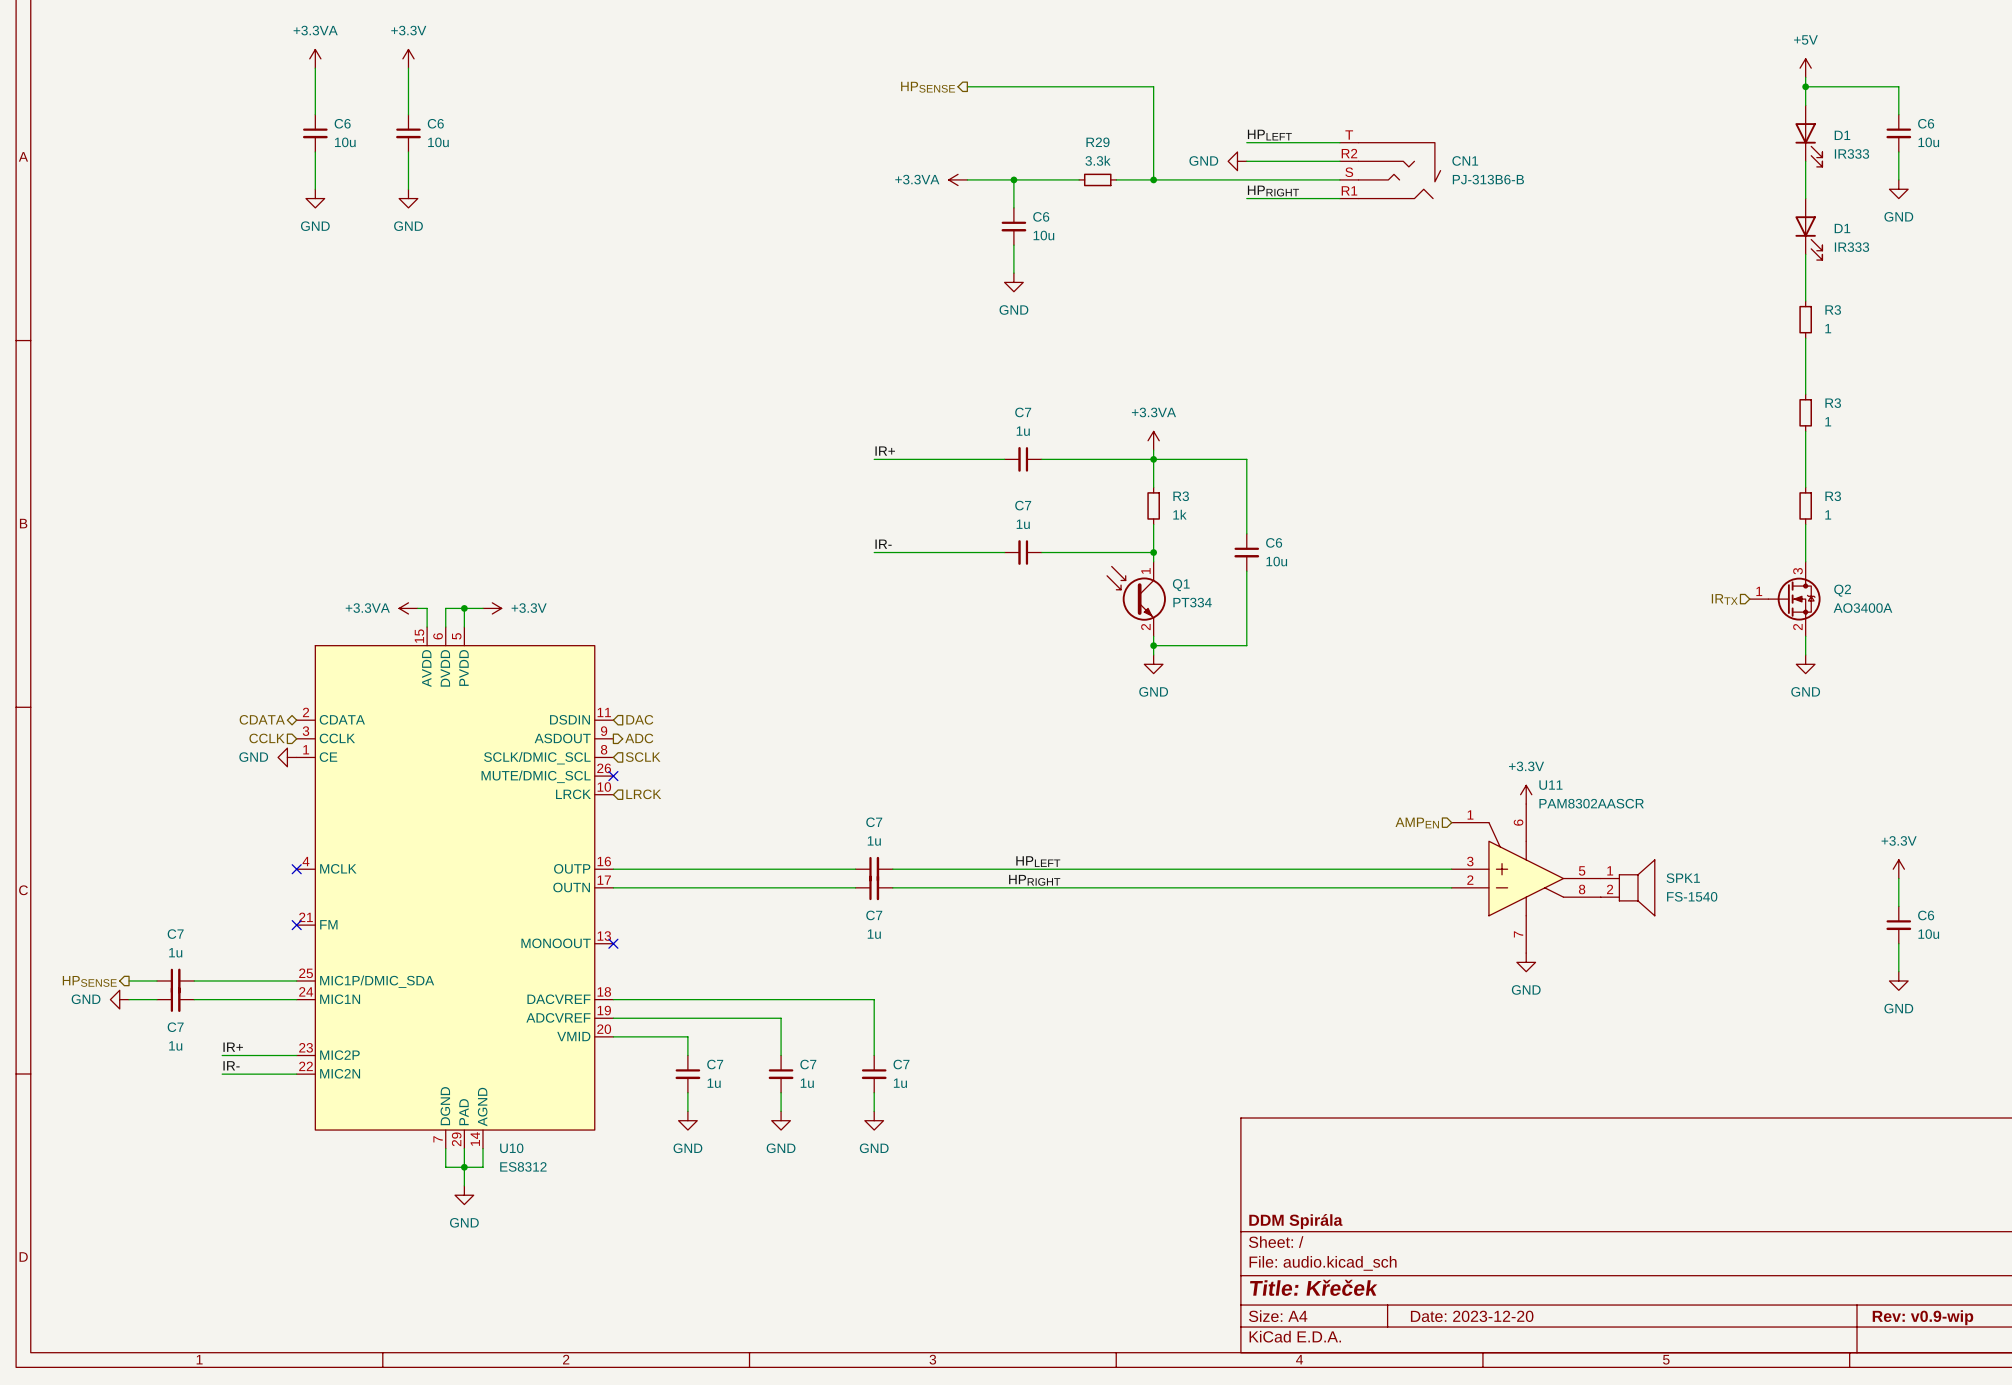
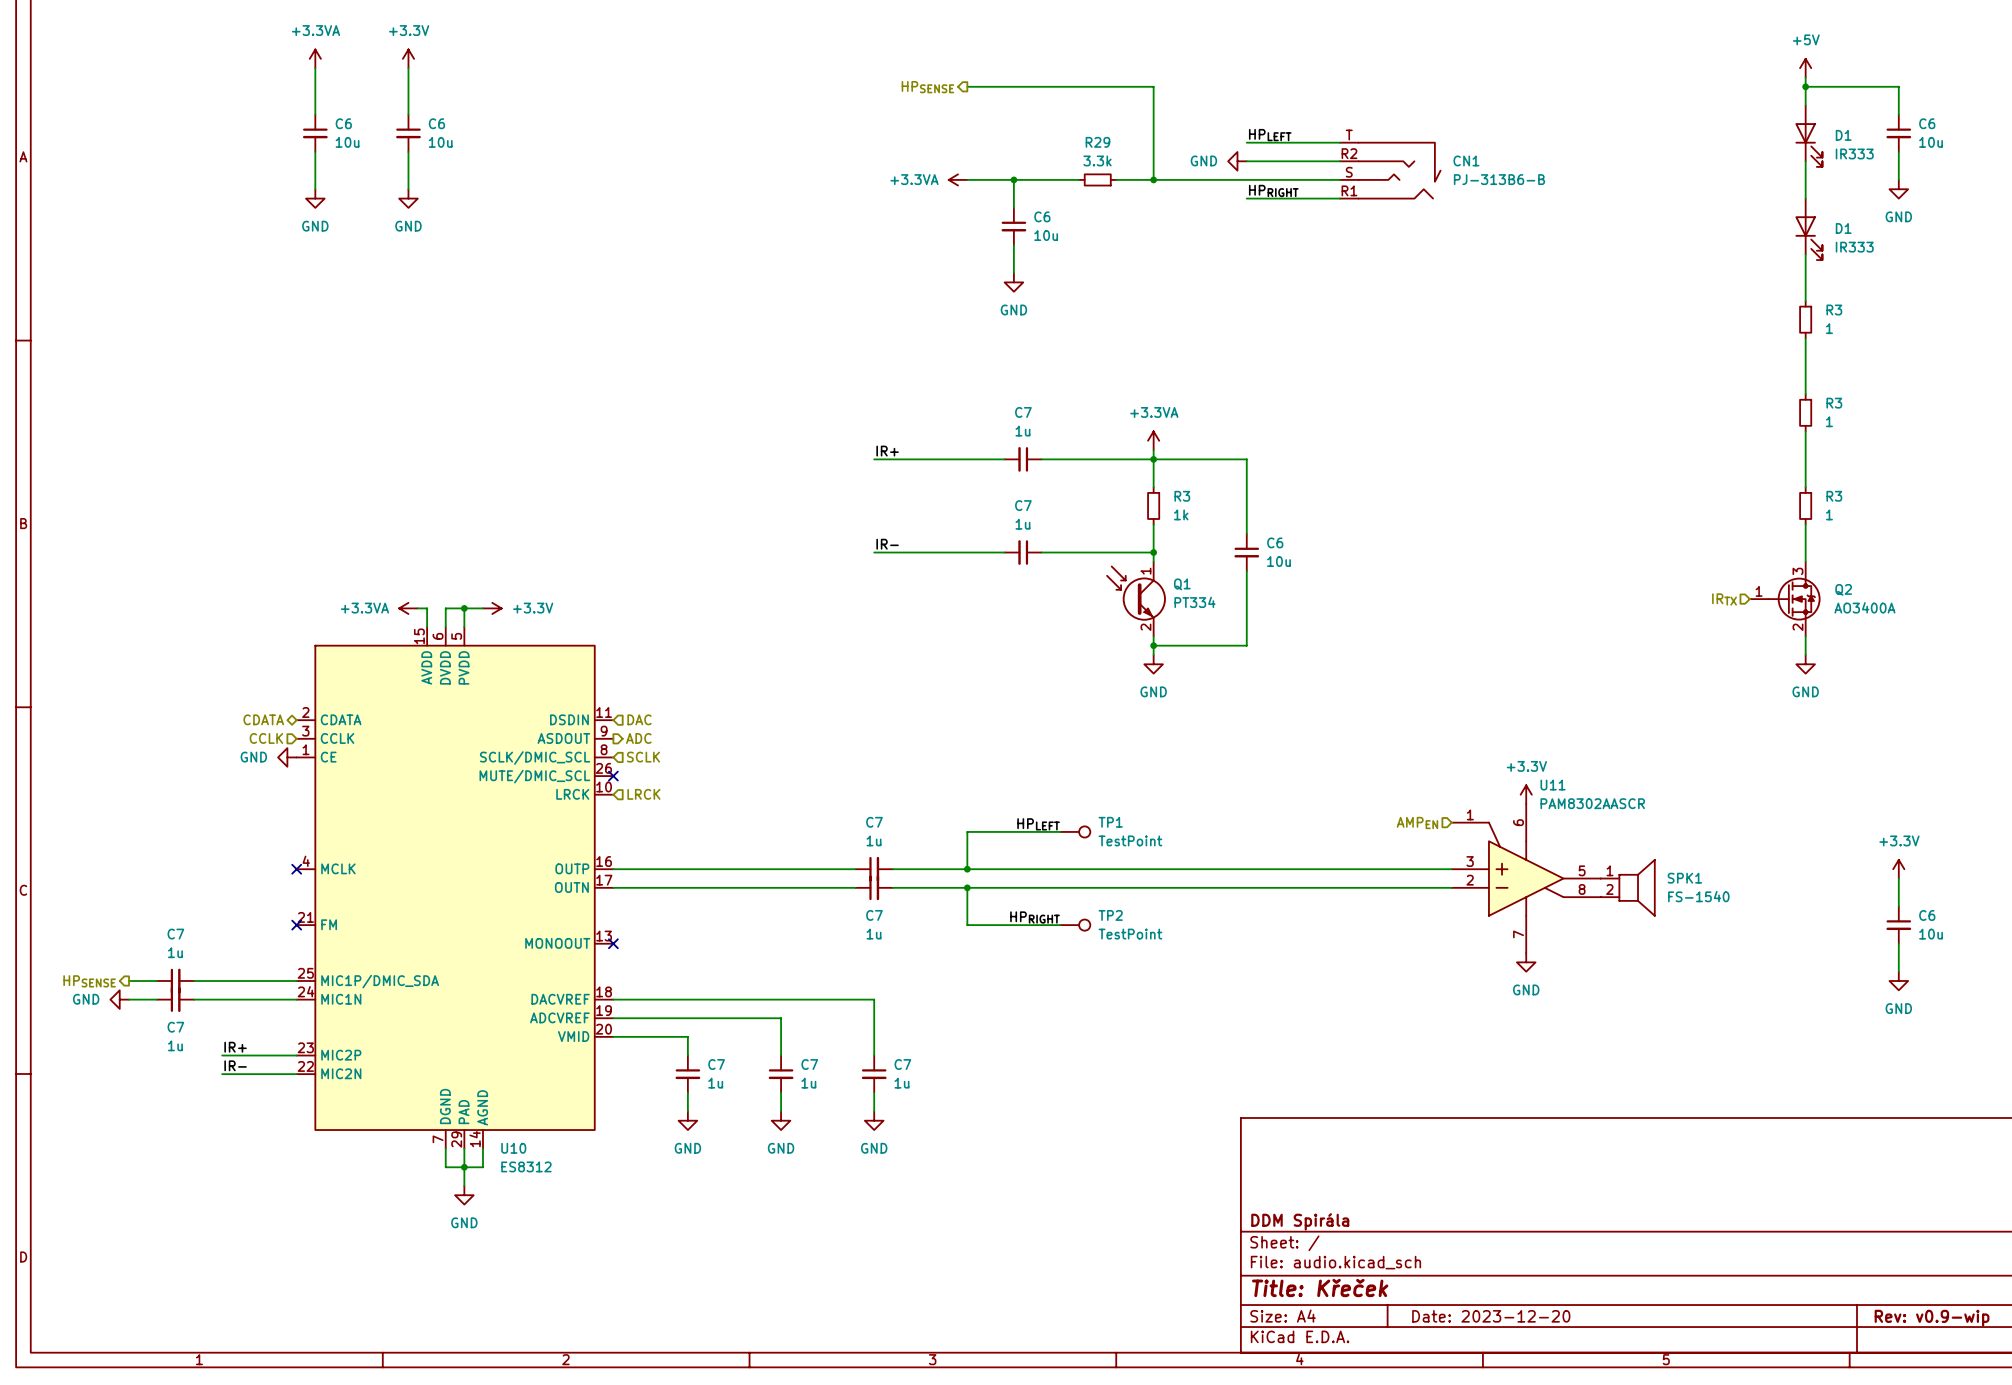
wire: none -> (1060, 831) (967, 831) (967, 869)
TP1: none -> TestPoint (1075, 831)
label position: HPLEFT (1038, 861) -> HPLEFT (1038, 824)
junction: none -> (967, 869)
label position: HPRIGHT (1034, 880) -> HPRIGHT (1035, 917)
wire: none -> (967, 887) (967, 925) (1060, 925)
junction: none -> (967, 887)
TP2: none -> TestPoint (1075, 925)

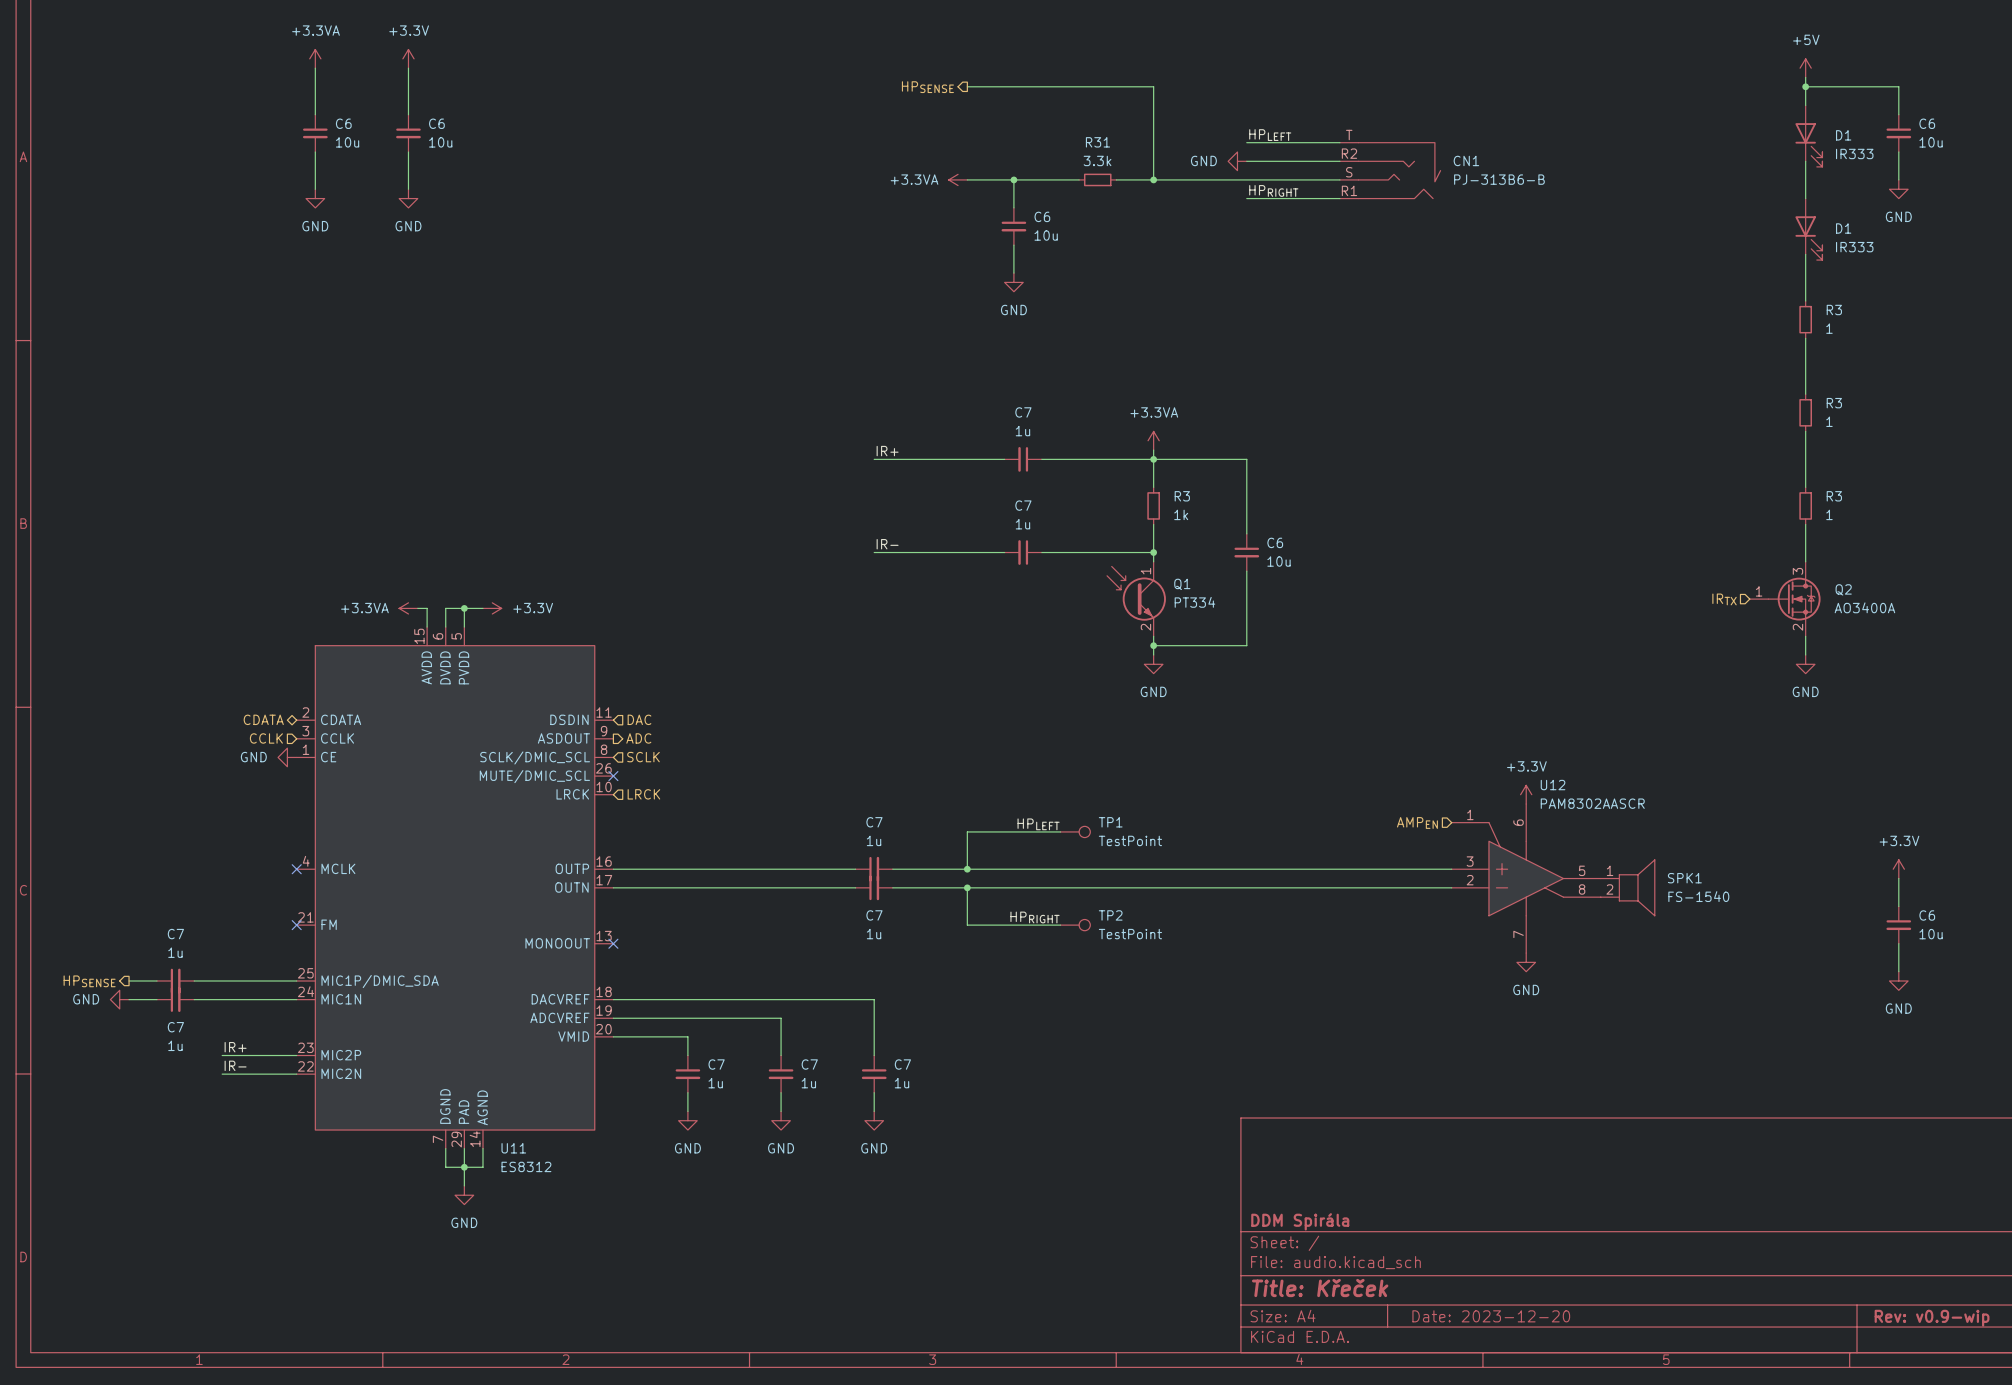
R29 name: R29 (1097, 142) -> R31 (1097, 142)
U11 name: U11 (1553, 785) -> U12 (1553, 785)
U10 name: U10 (513, 1148) -> U11 (513, 1148)

